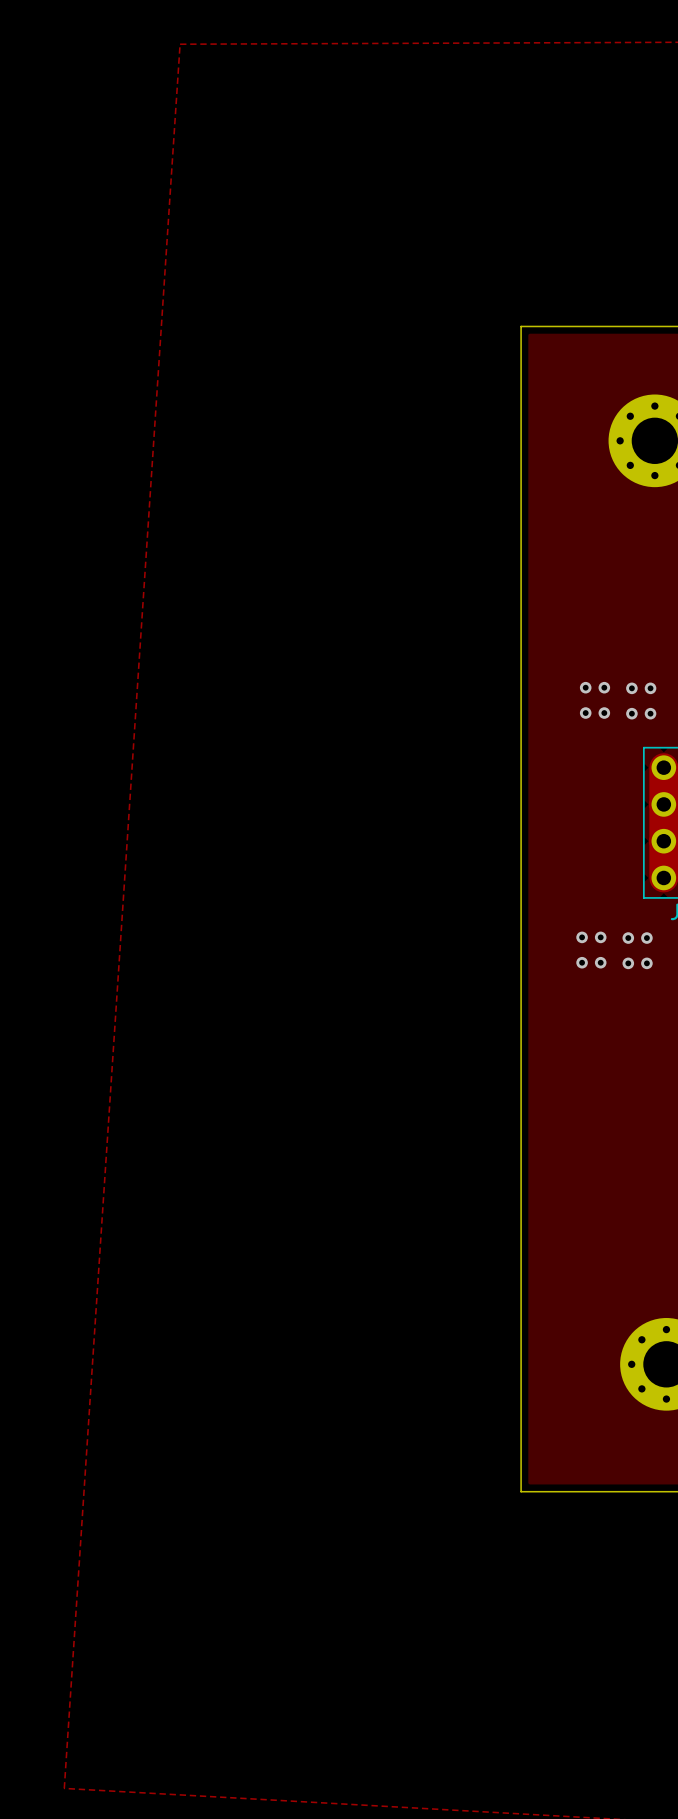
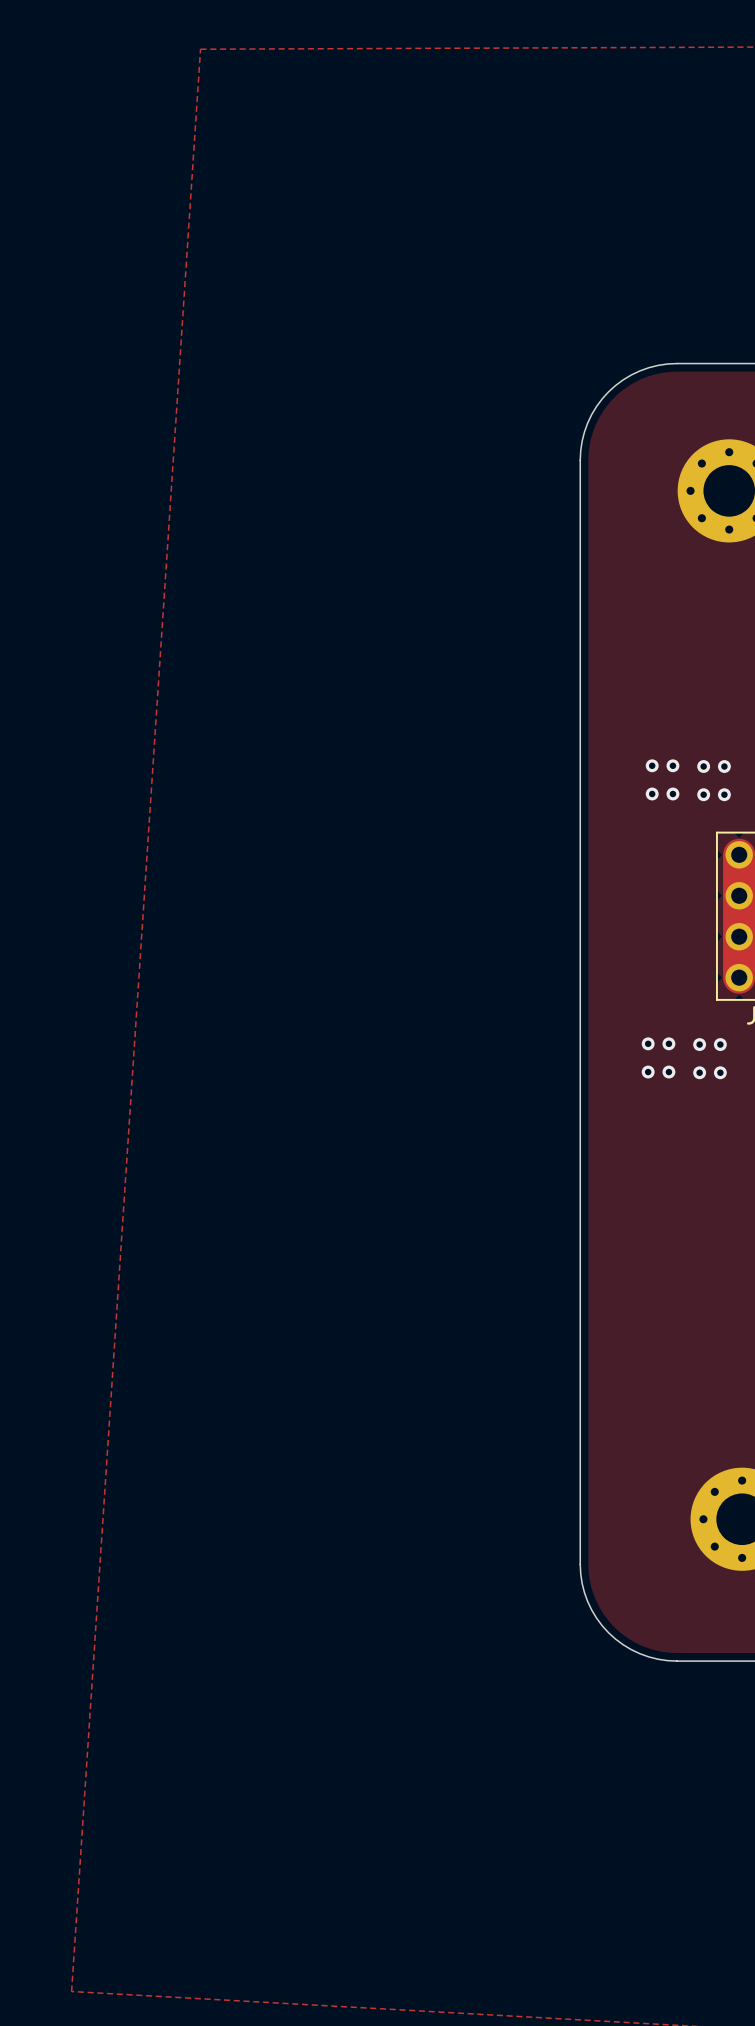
board edge: (607, 326) (521, 326) (521, 413) -> (676, 363) (658, 365) (639, 370) (623, 379) (608, 391) (596, 406) (587, 423) (582, 441) (580, 460)
board edge: (521, 1404) (521, 1491) (607, 1491) -> (580, 1564) (582, 1583) (587, 1601) (596, 1618) (608, 1632) (623, 1644) (639, 1653) (658, 1659) (676, 1661)

